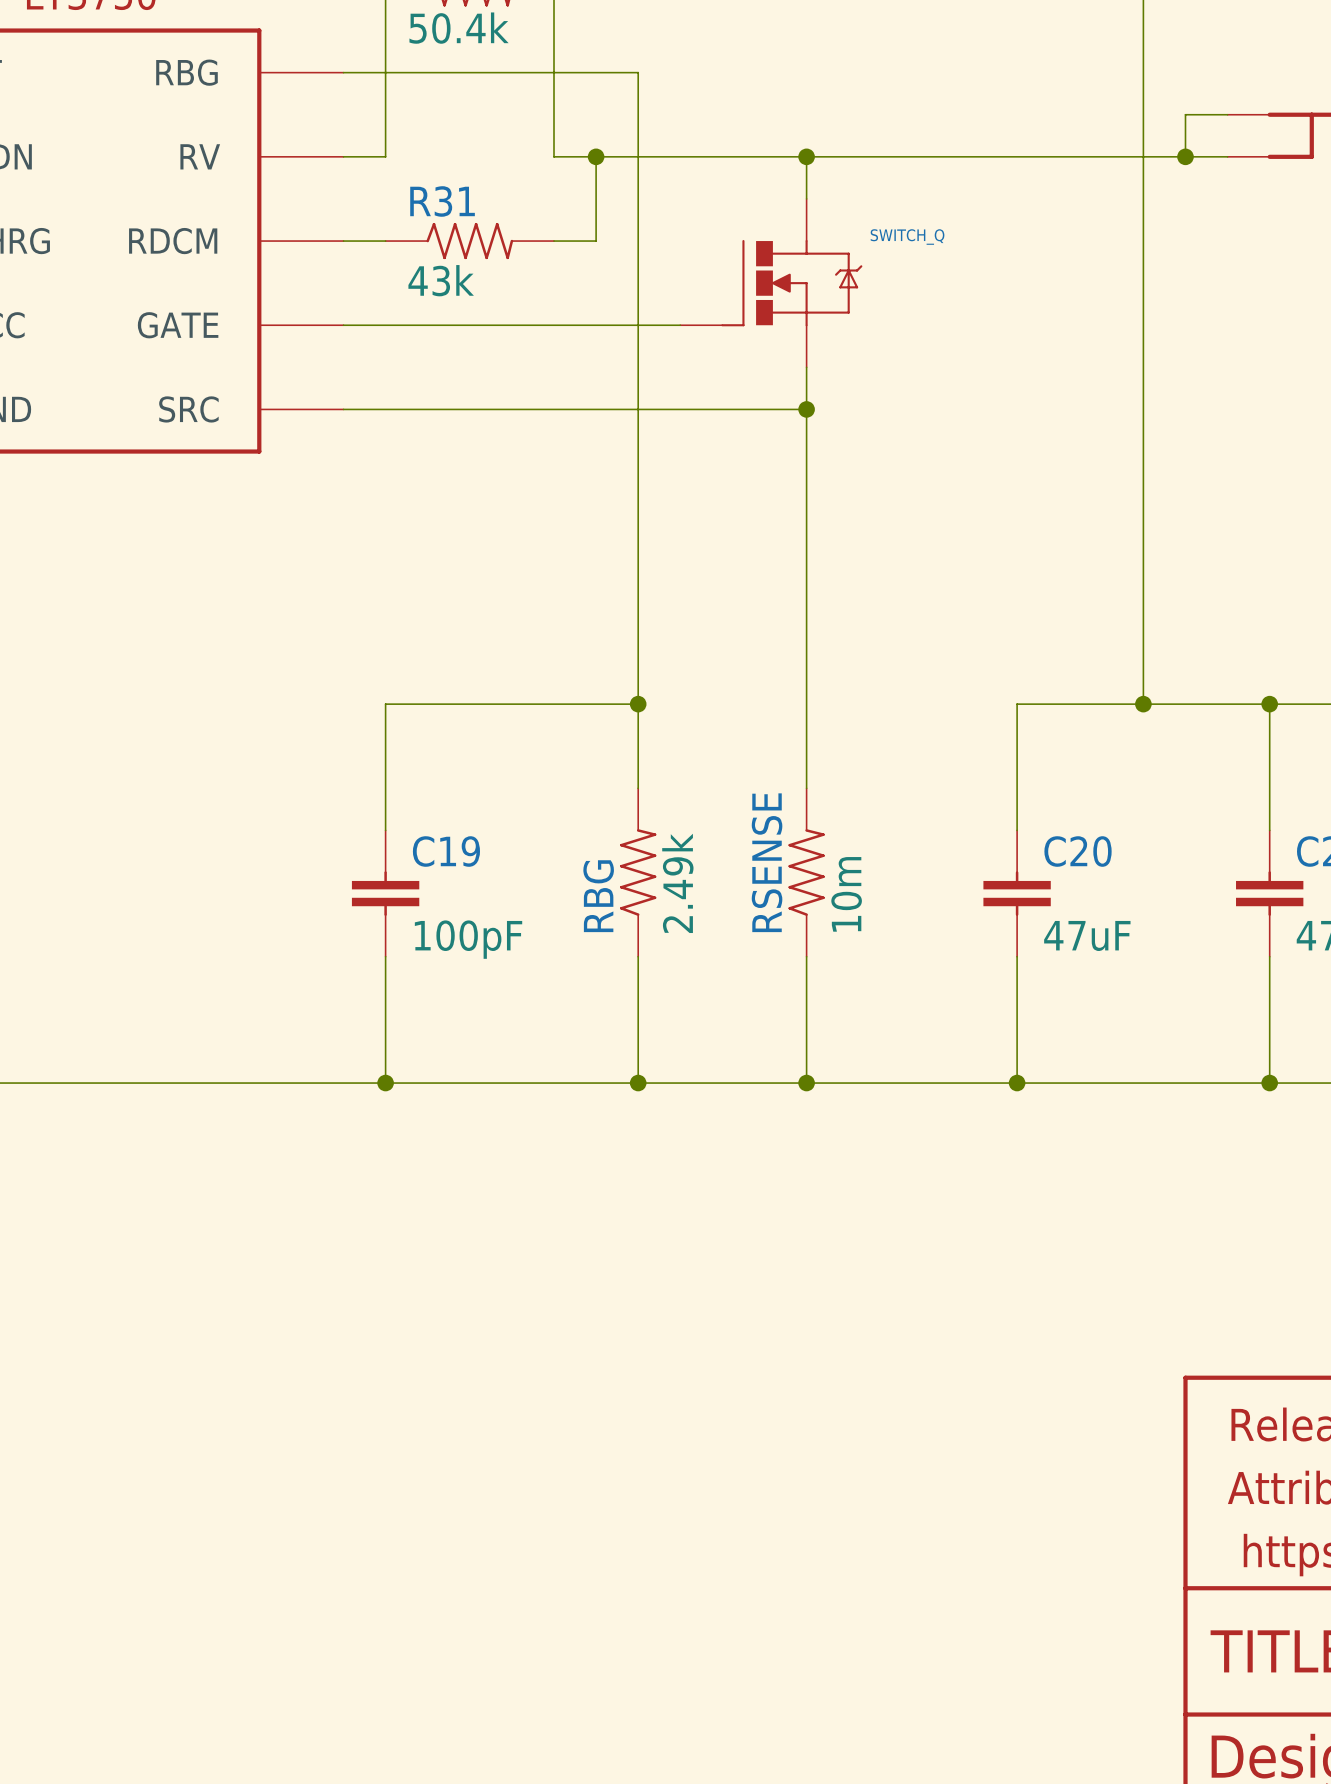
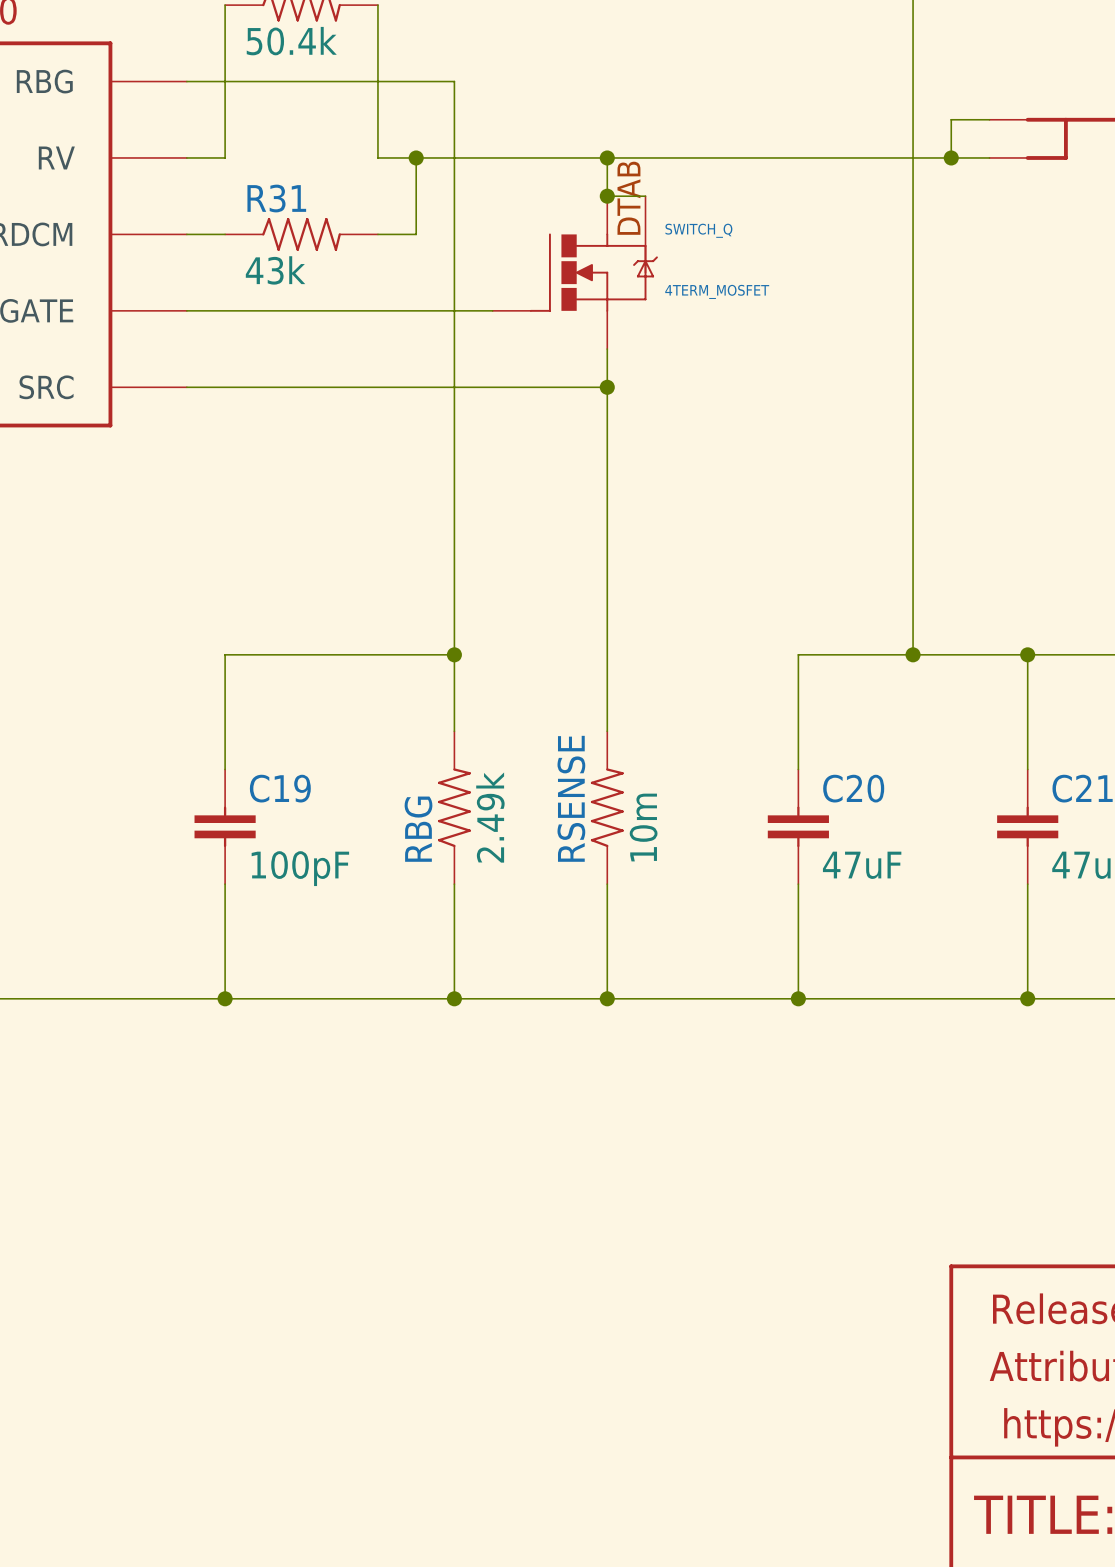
SWITCH_Q symbol: [680, 198, 863, 368] -> [492, 196, 658, 350]
wire: none -> (607, 196) (645, 196)
junction: none -> (607, 196)
SWITCH_Q value: none -> 4TERM_MOSFET (717, 291)

